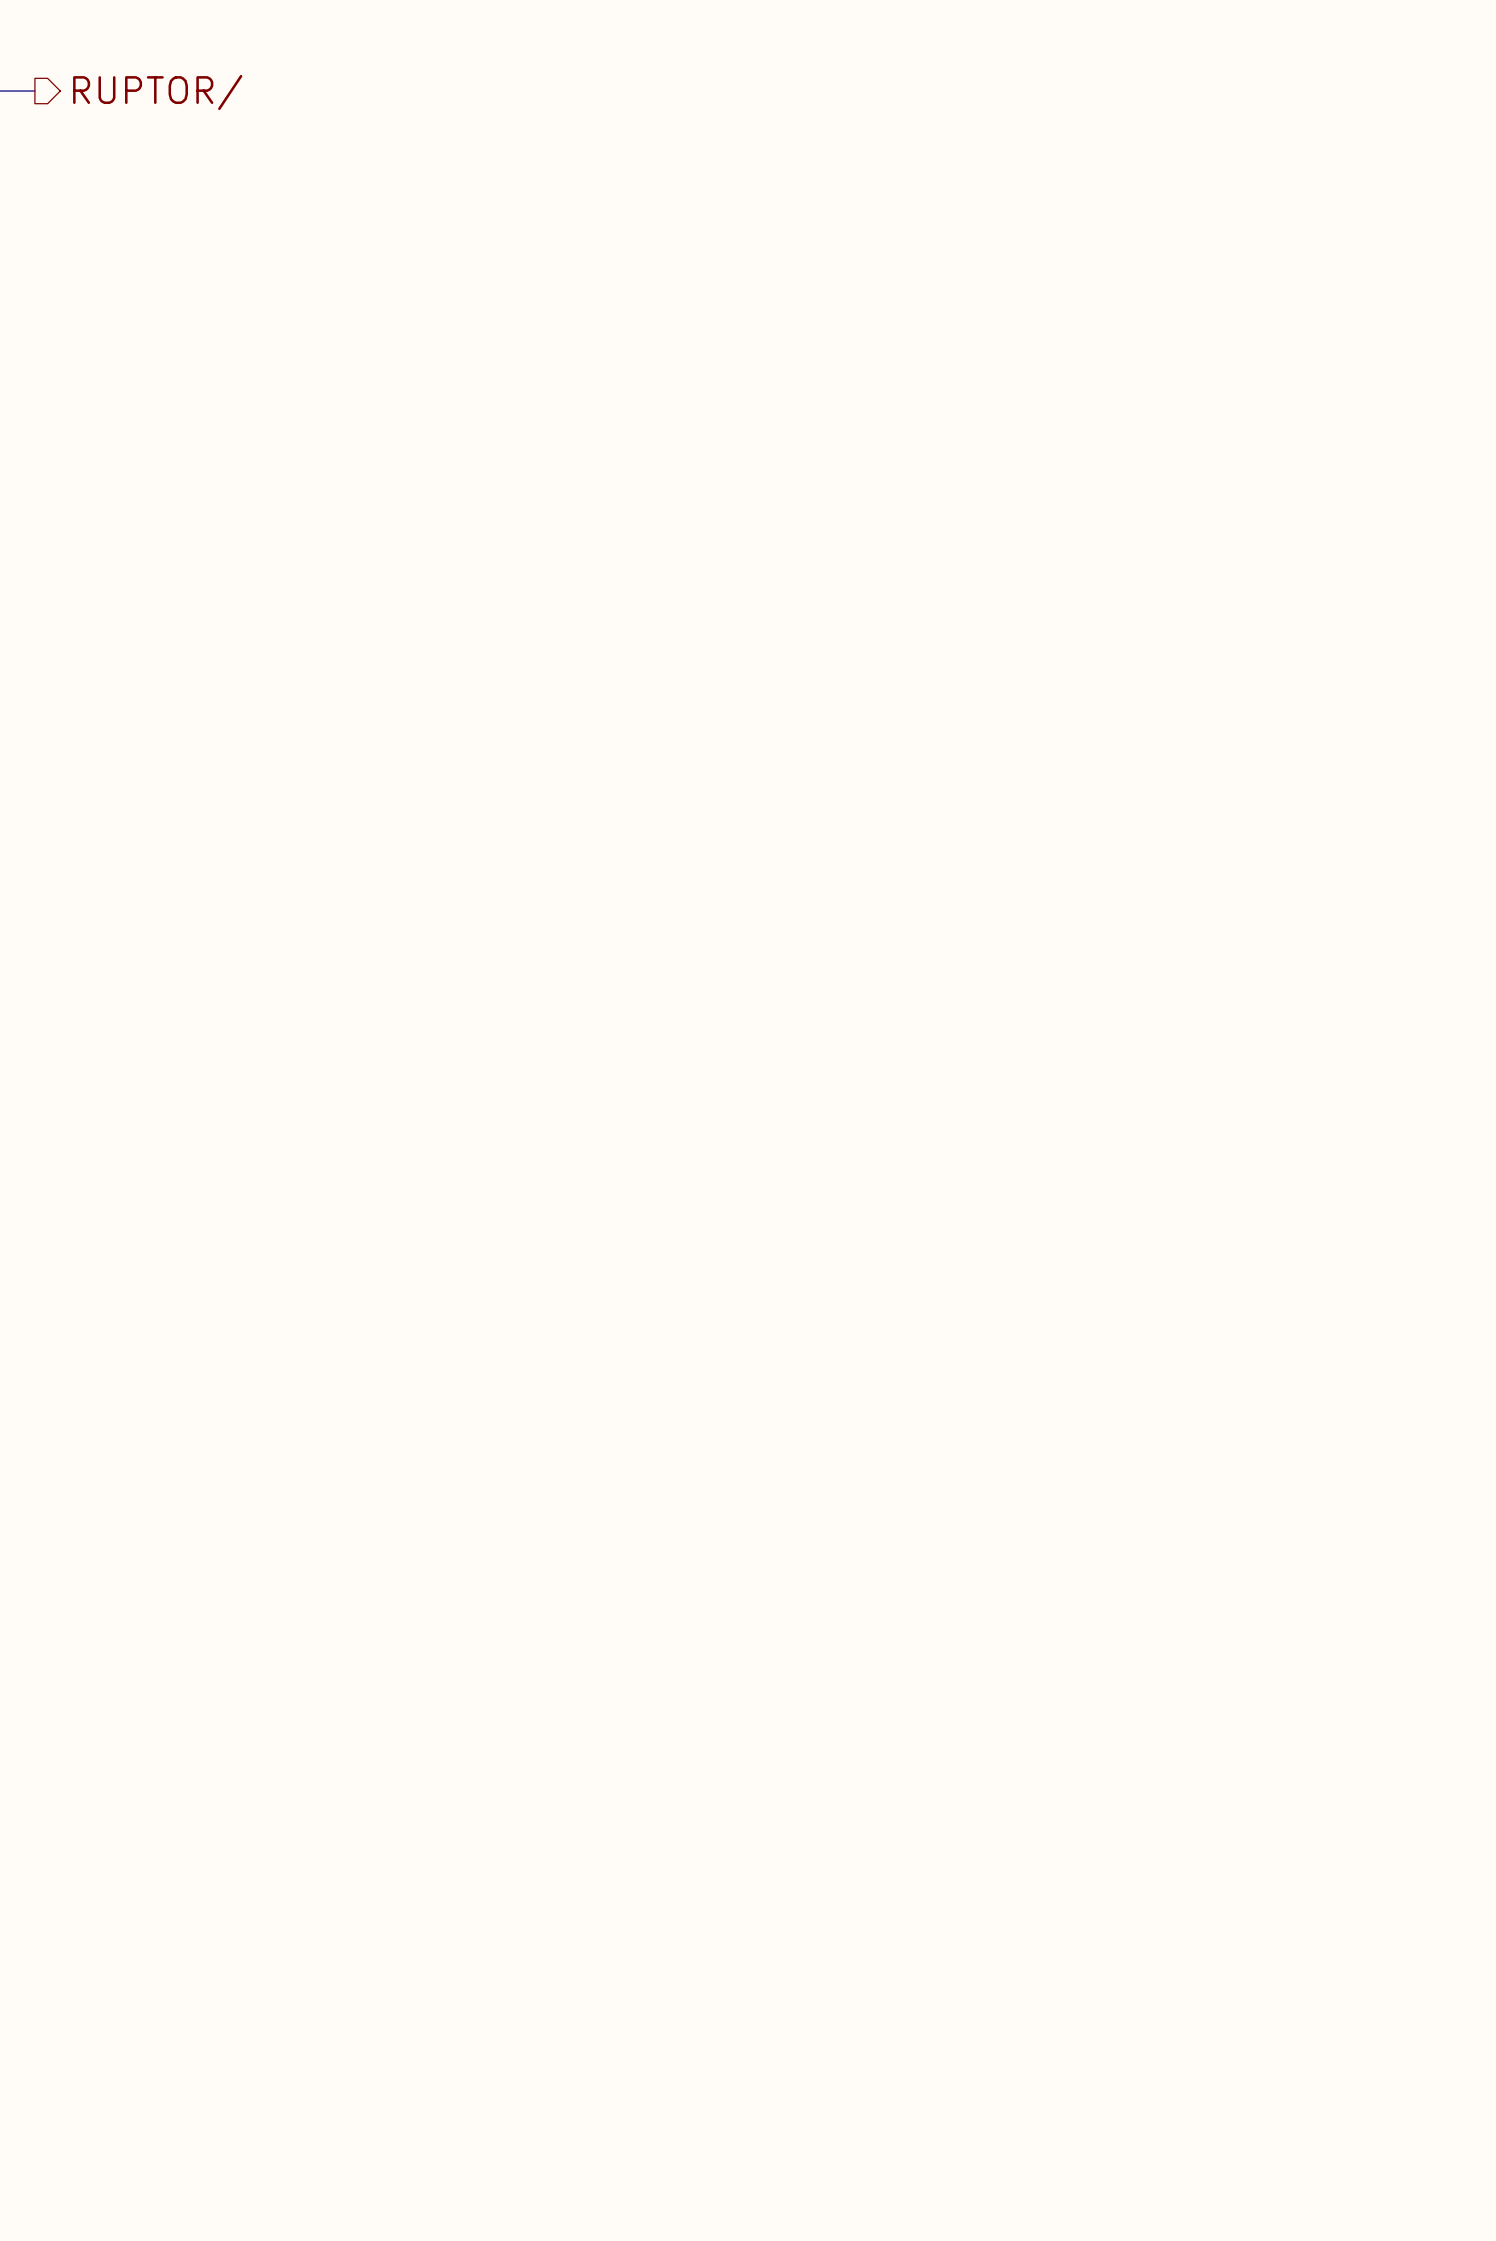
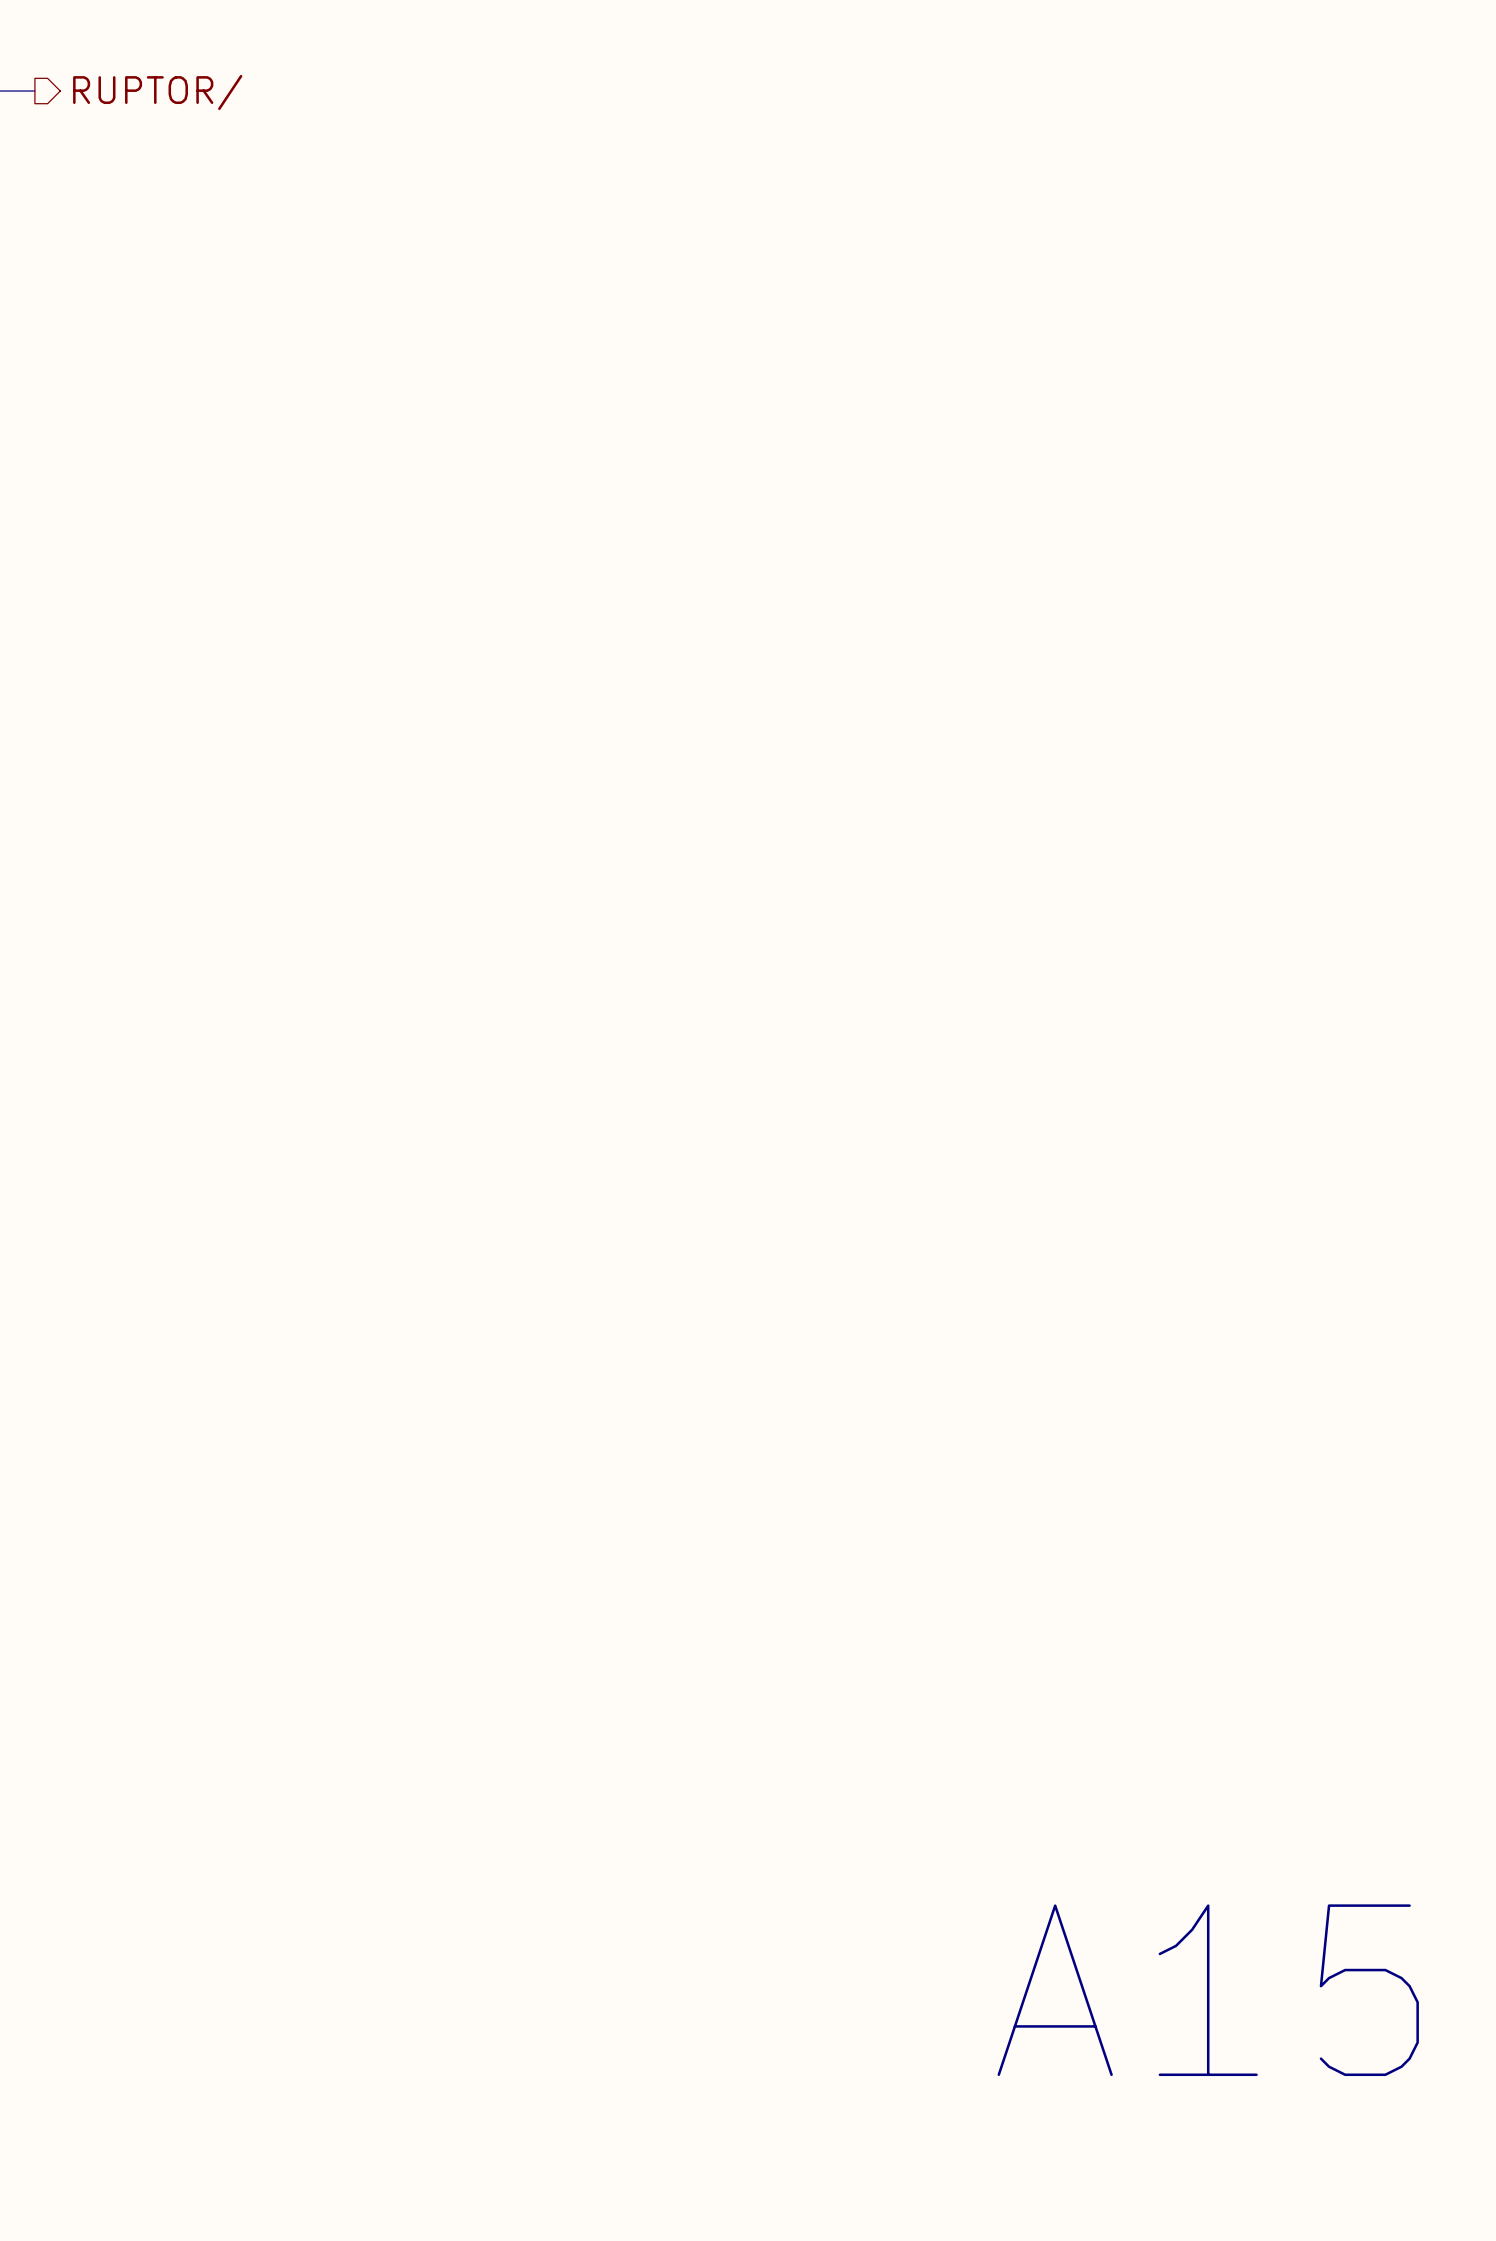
text: none -> A15 (1208, 1990)

